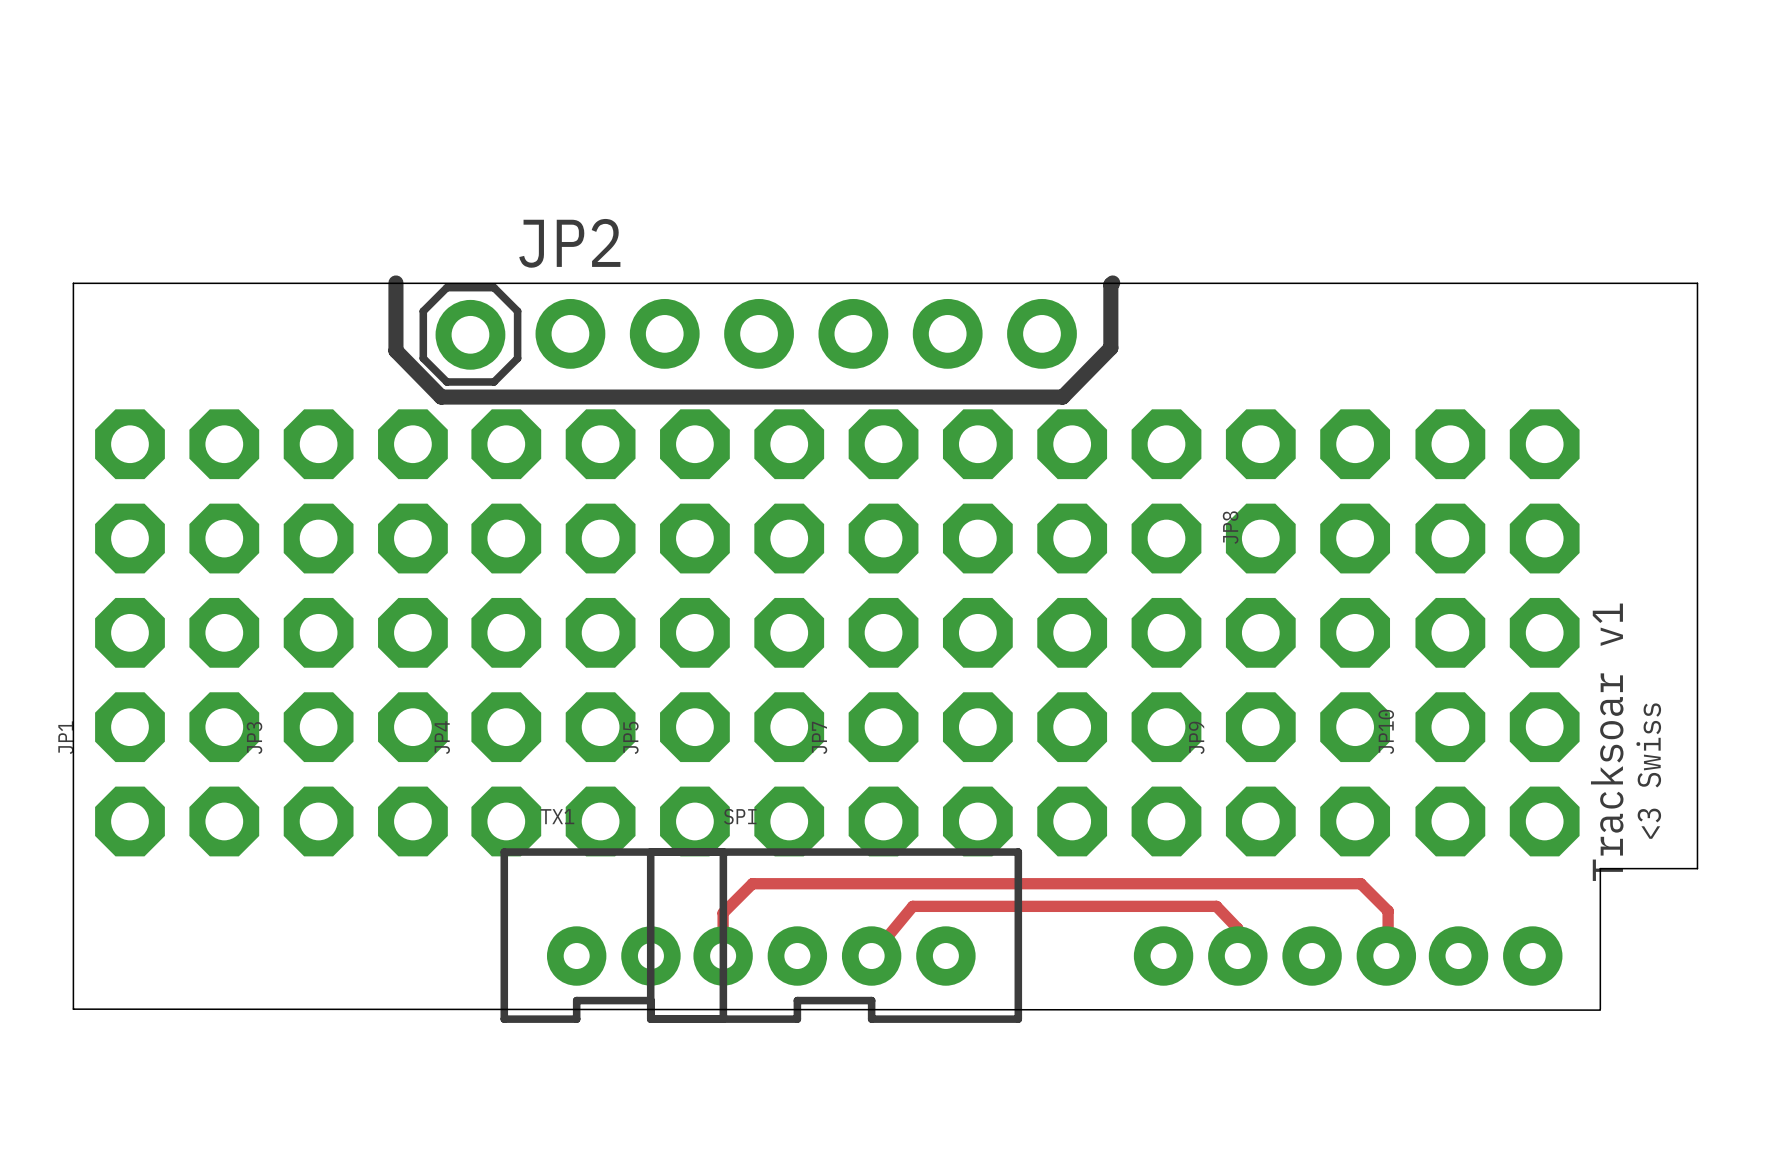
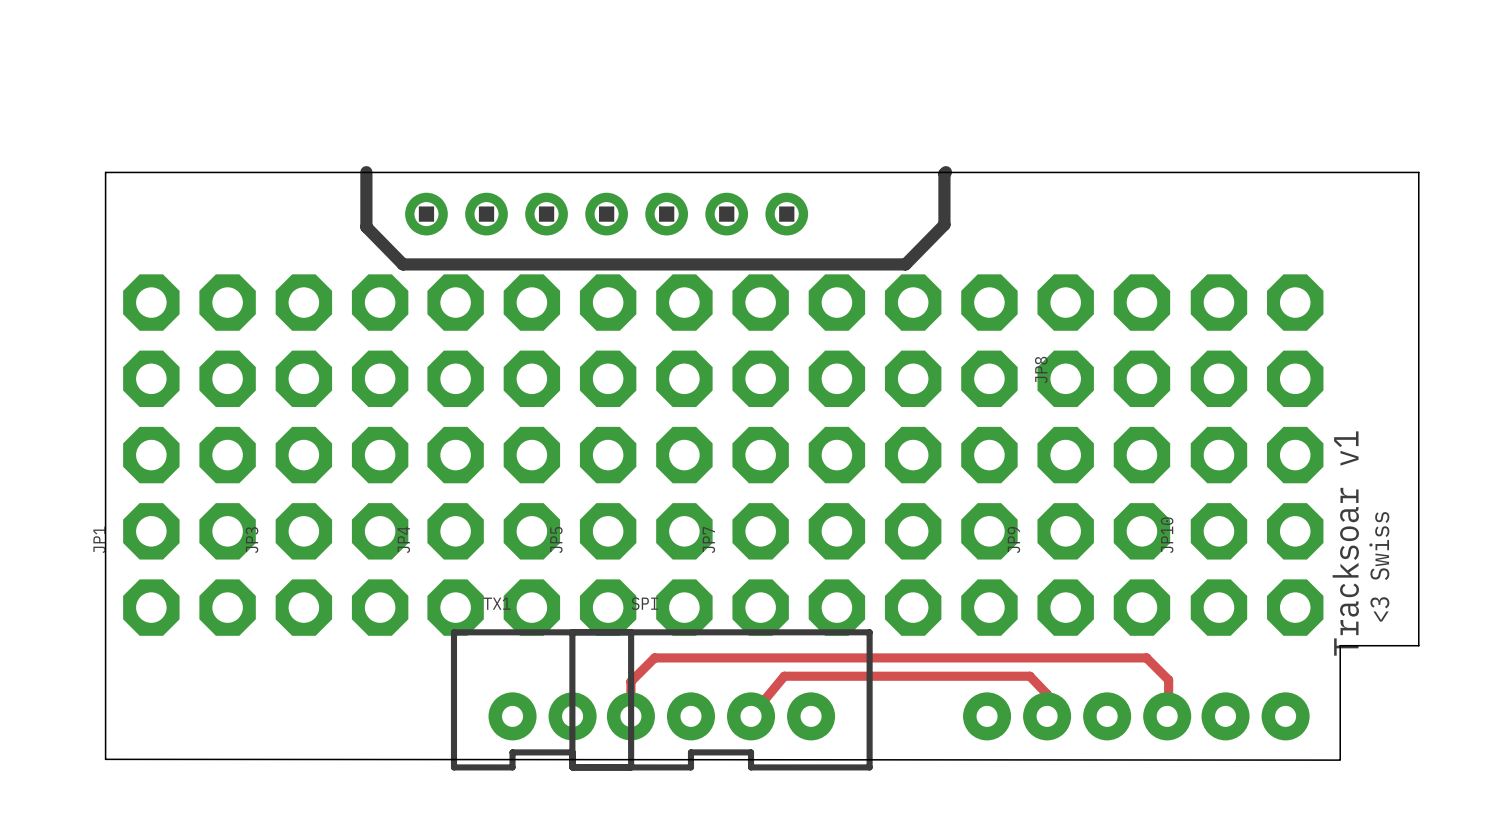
part: (806, 333) -> none
JP2: (470, 334) -> none
part: none -> (606, 214)

